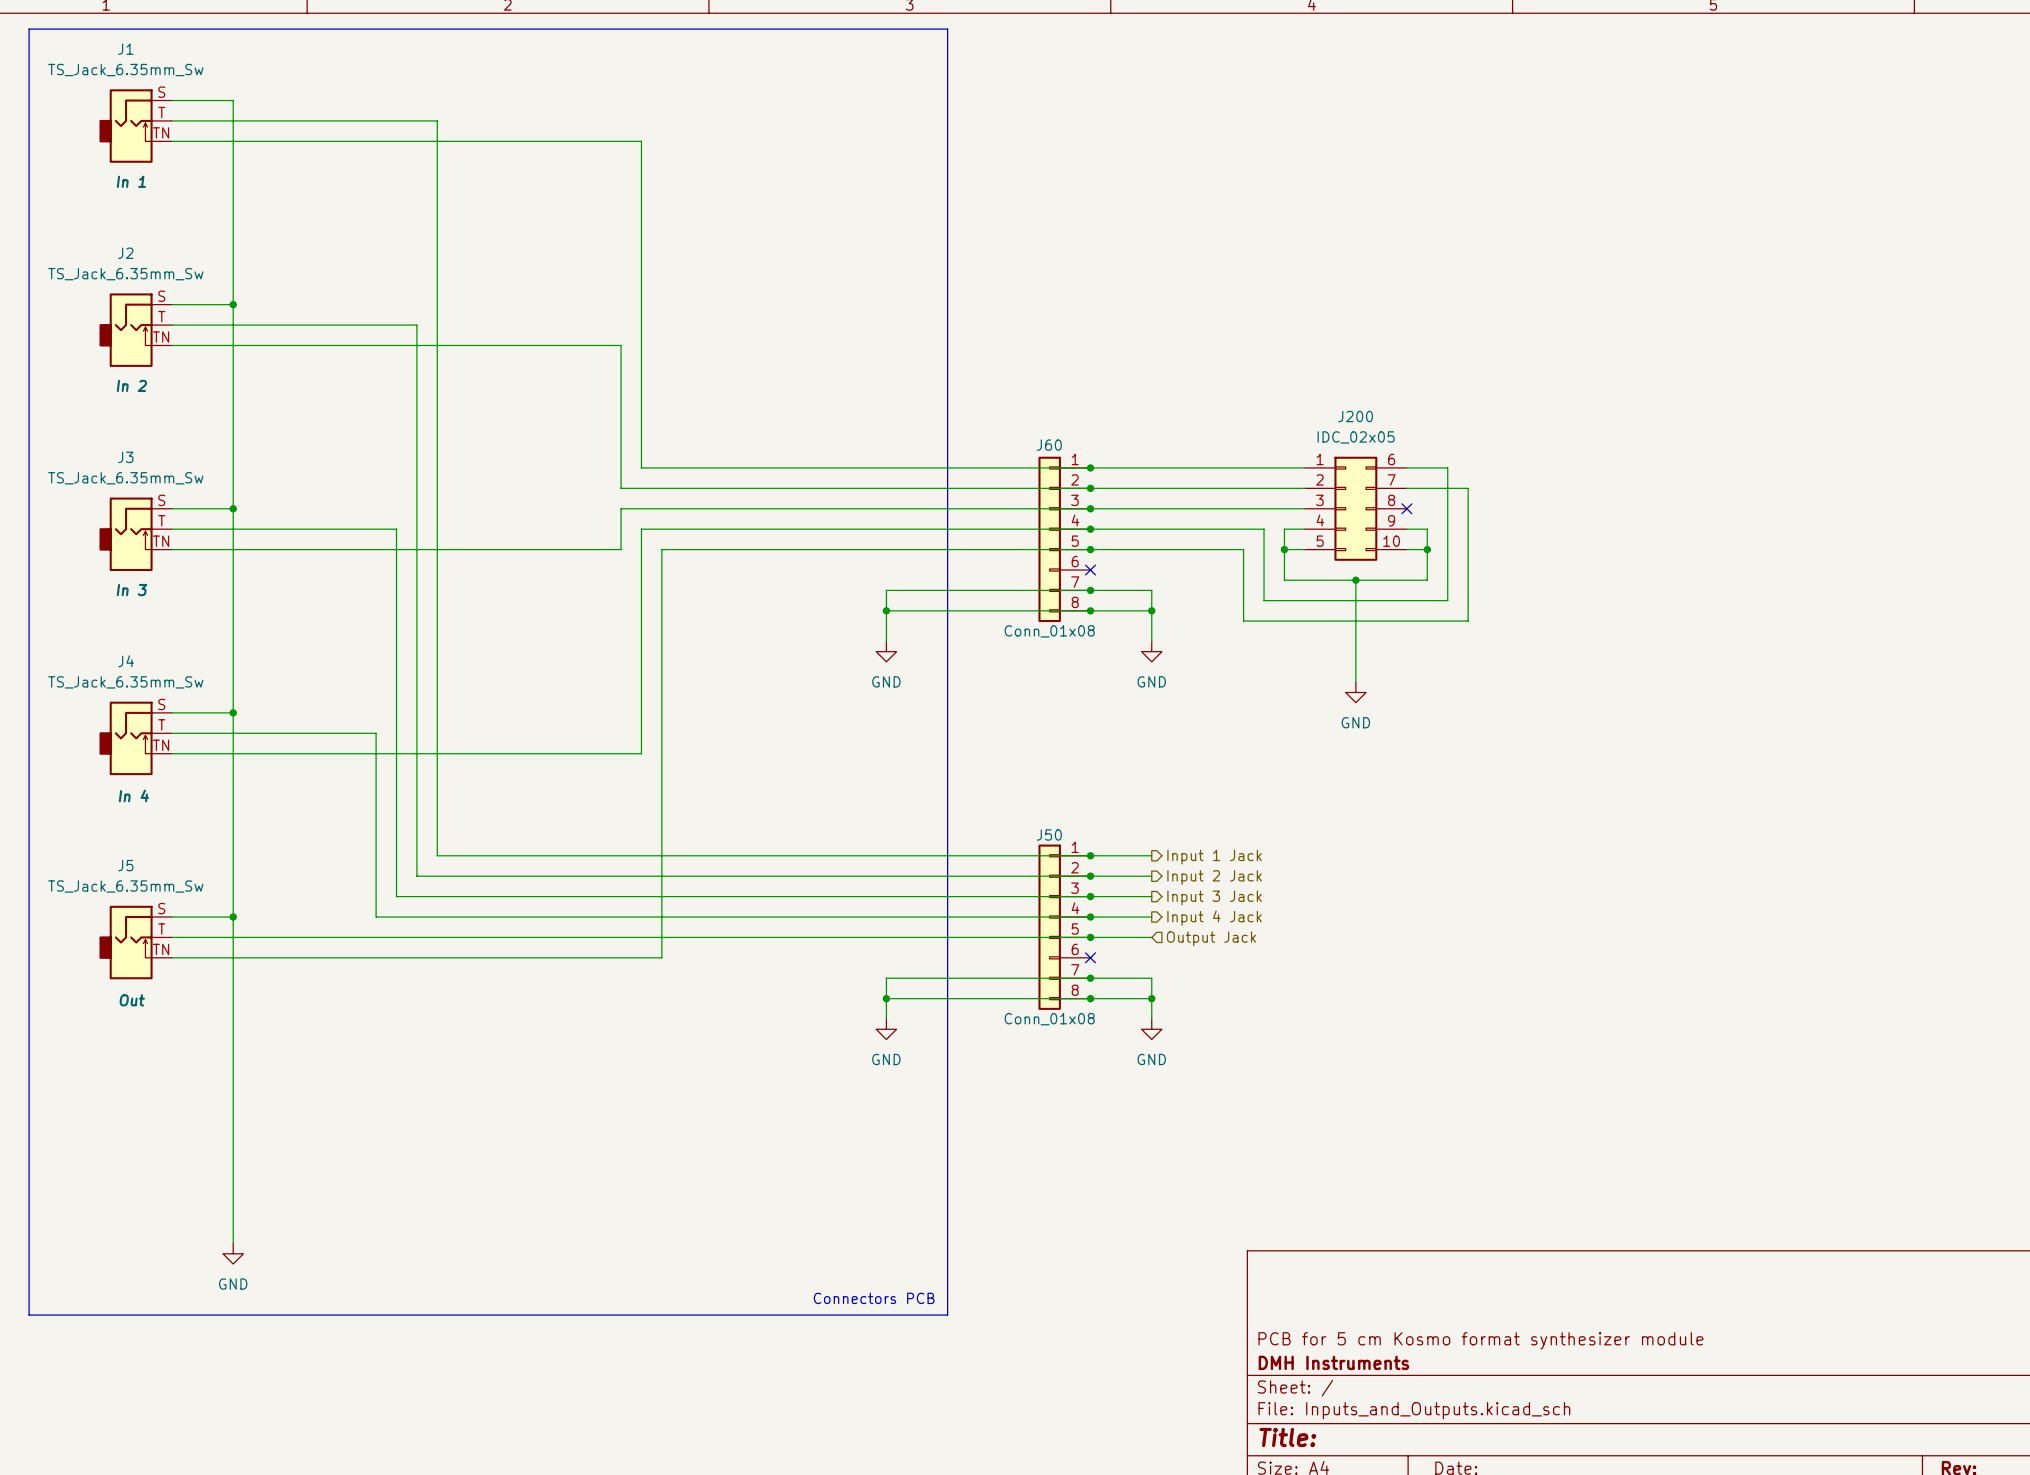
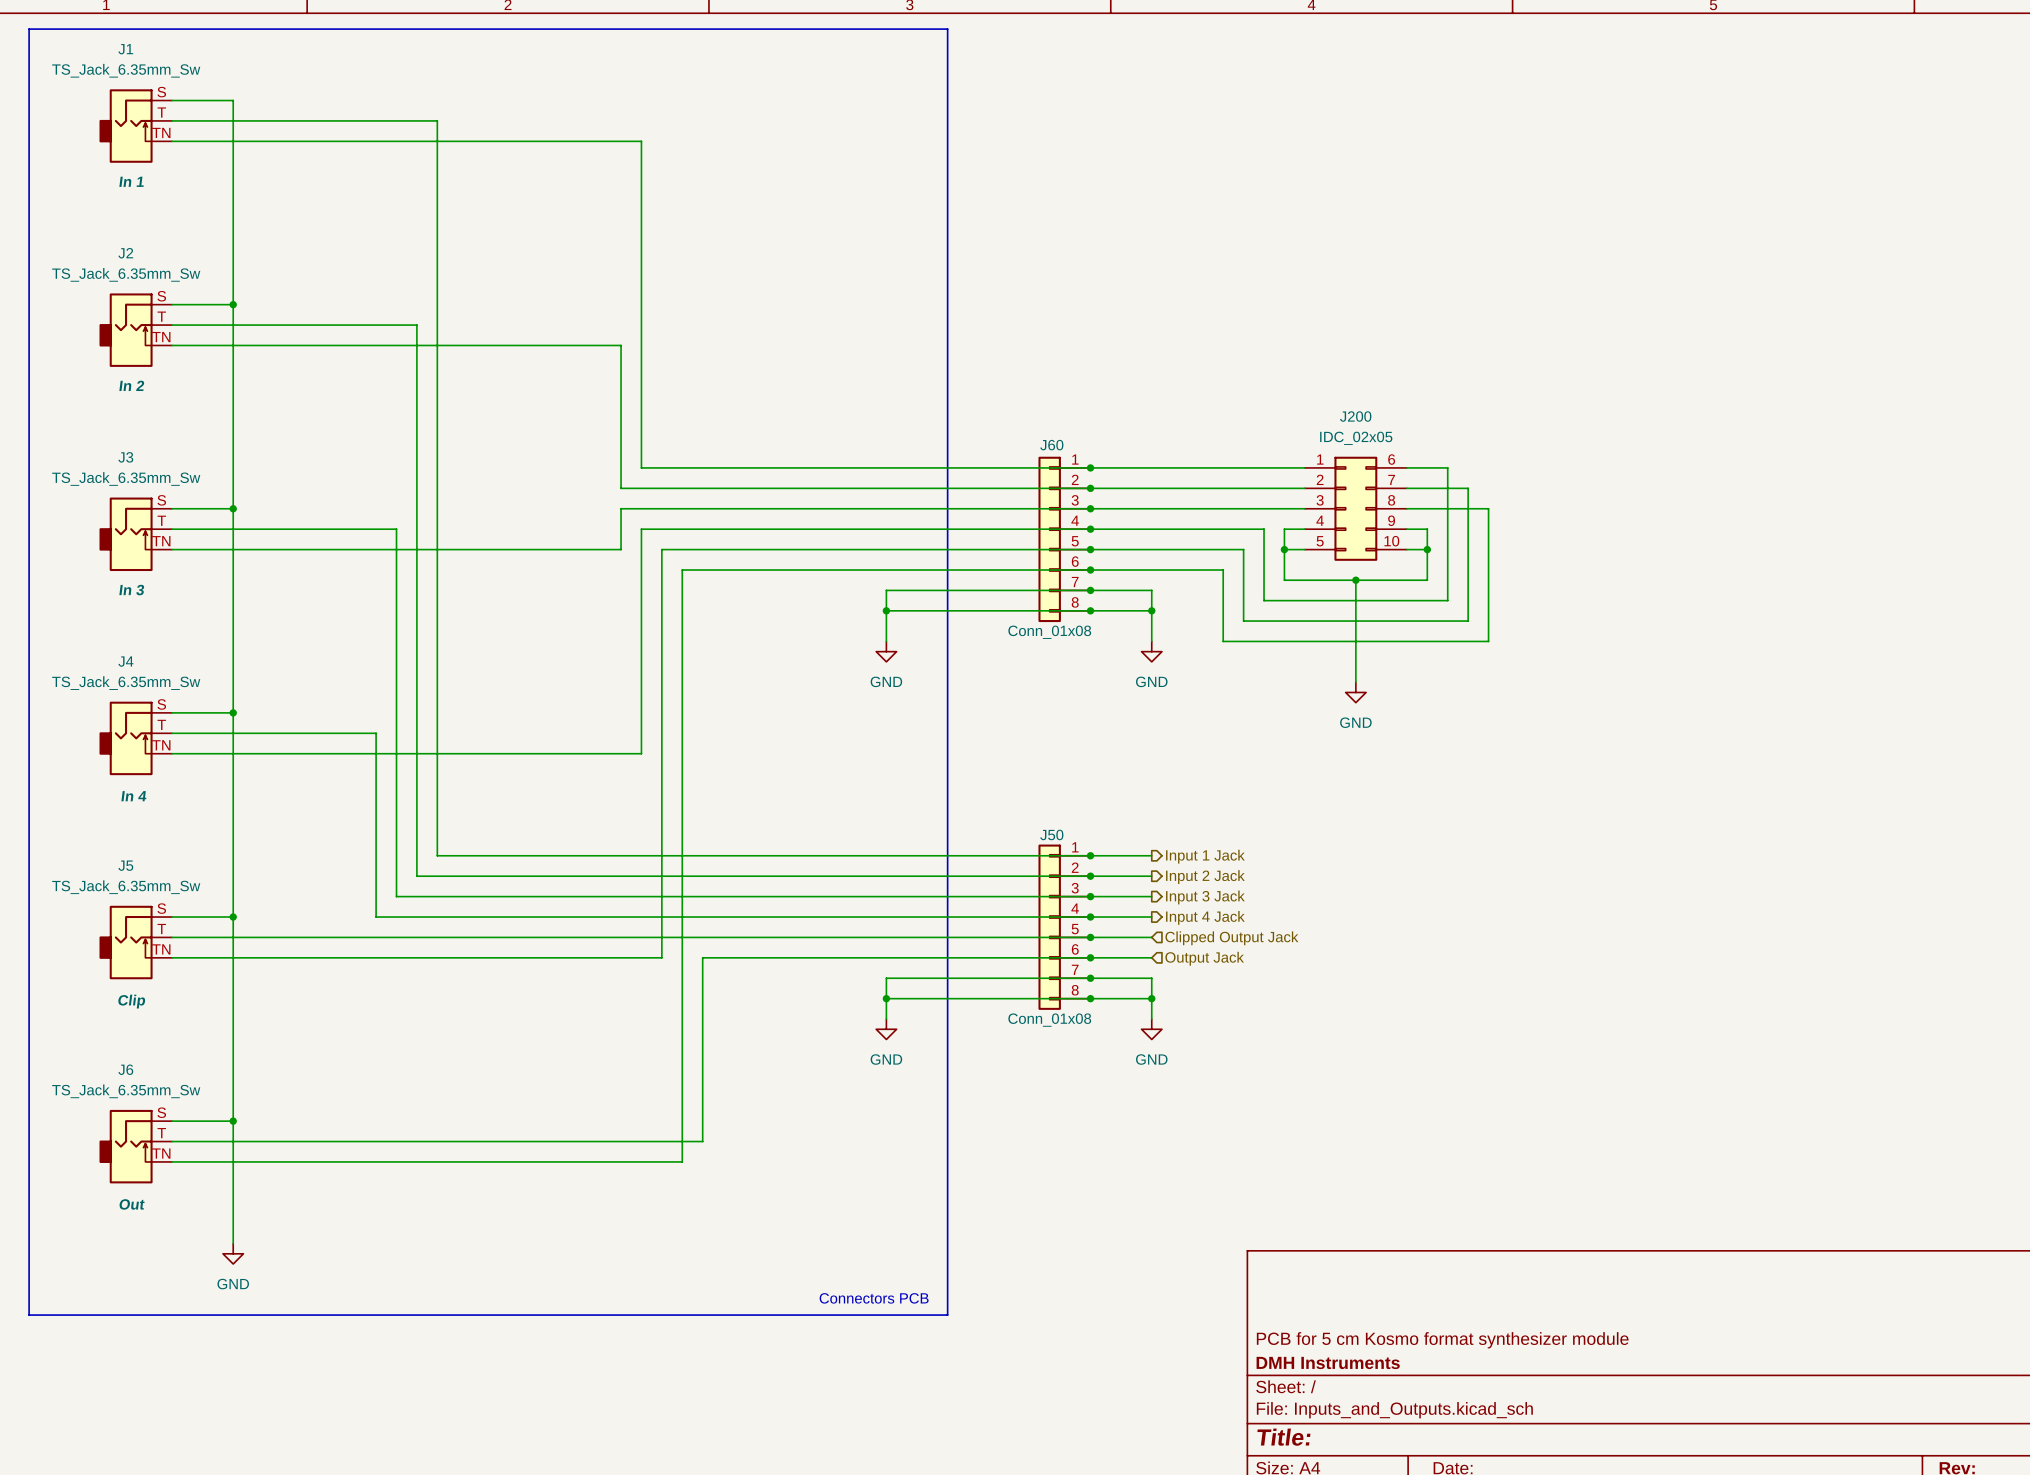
wire: none -> (1406, 508) (1488, 508) (1488, 641) (1223, 641) (1223, 570) (682, 570) (682, 1161) (171, 1161)
no-connect mark: (1406, 508) -> none
no-connect mark: (1090, 570) -> none
junction: none -> (1090, 570)
hierarchical label: Output Jack (1211, 938) -> Clipped Output Jack (1231, 938)
no-connect mark: (1090, 957) -> none
junction: none -> (1090, 957)
wire: none -> (1151, 957) (702, 957) (702, 1141) (171, 1141)
hierarchical label: none -> Output Jack (1204, 958)
J5 text: Out (132, 1000) -> Clip (131, 1001)
wire: none -> (171, 1121) (233, 1121)
junction: none -> (233, 1121)
J6: none -> TS_Jack_6.35mm_Sw (135, 1146)

